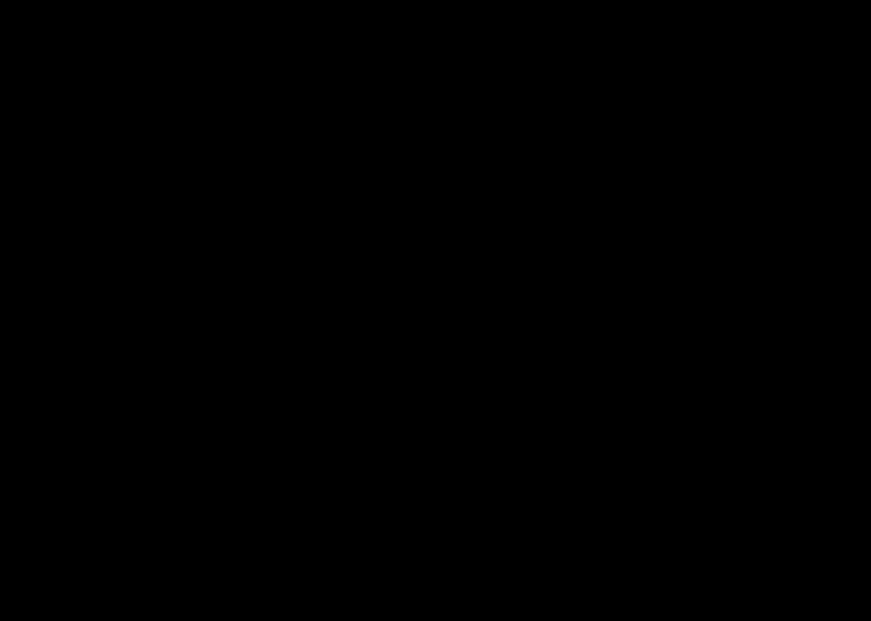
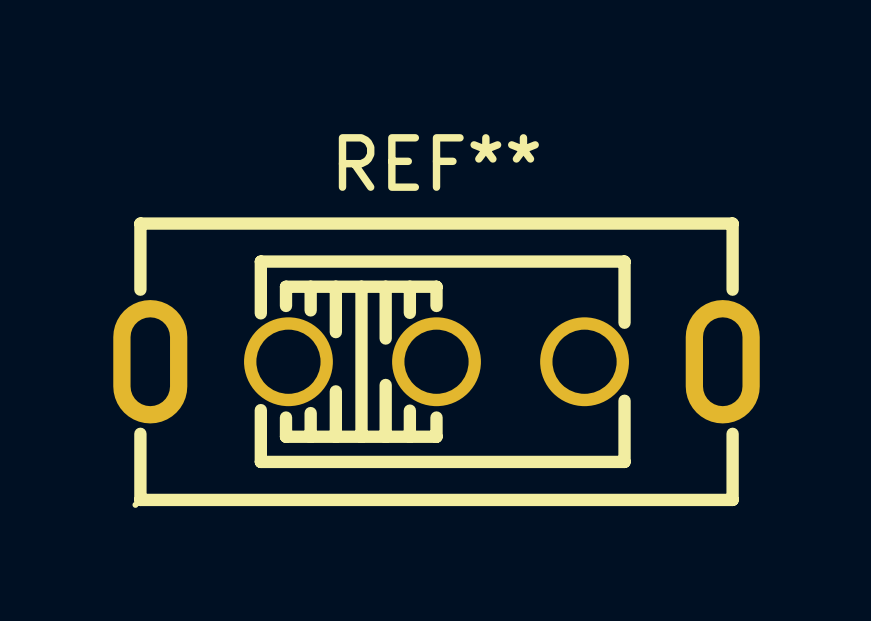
REF**: none -> (436, 362)

